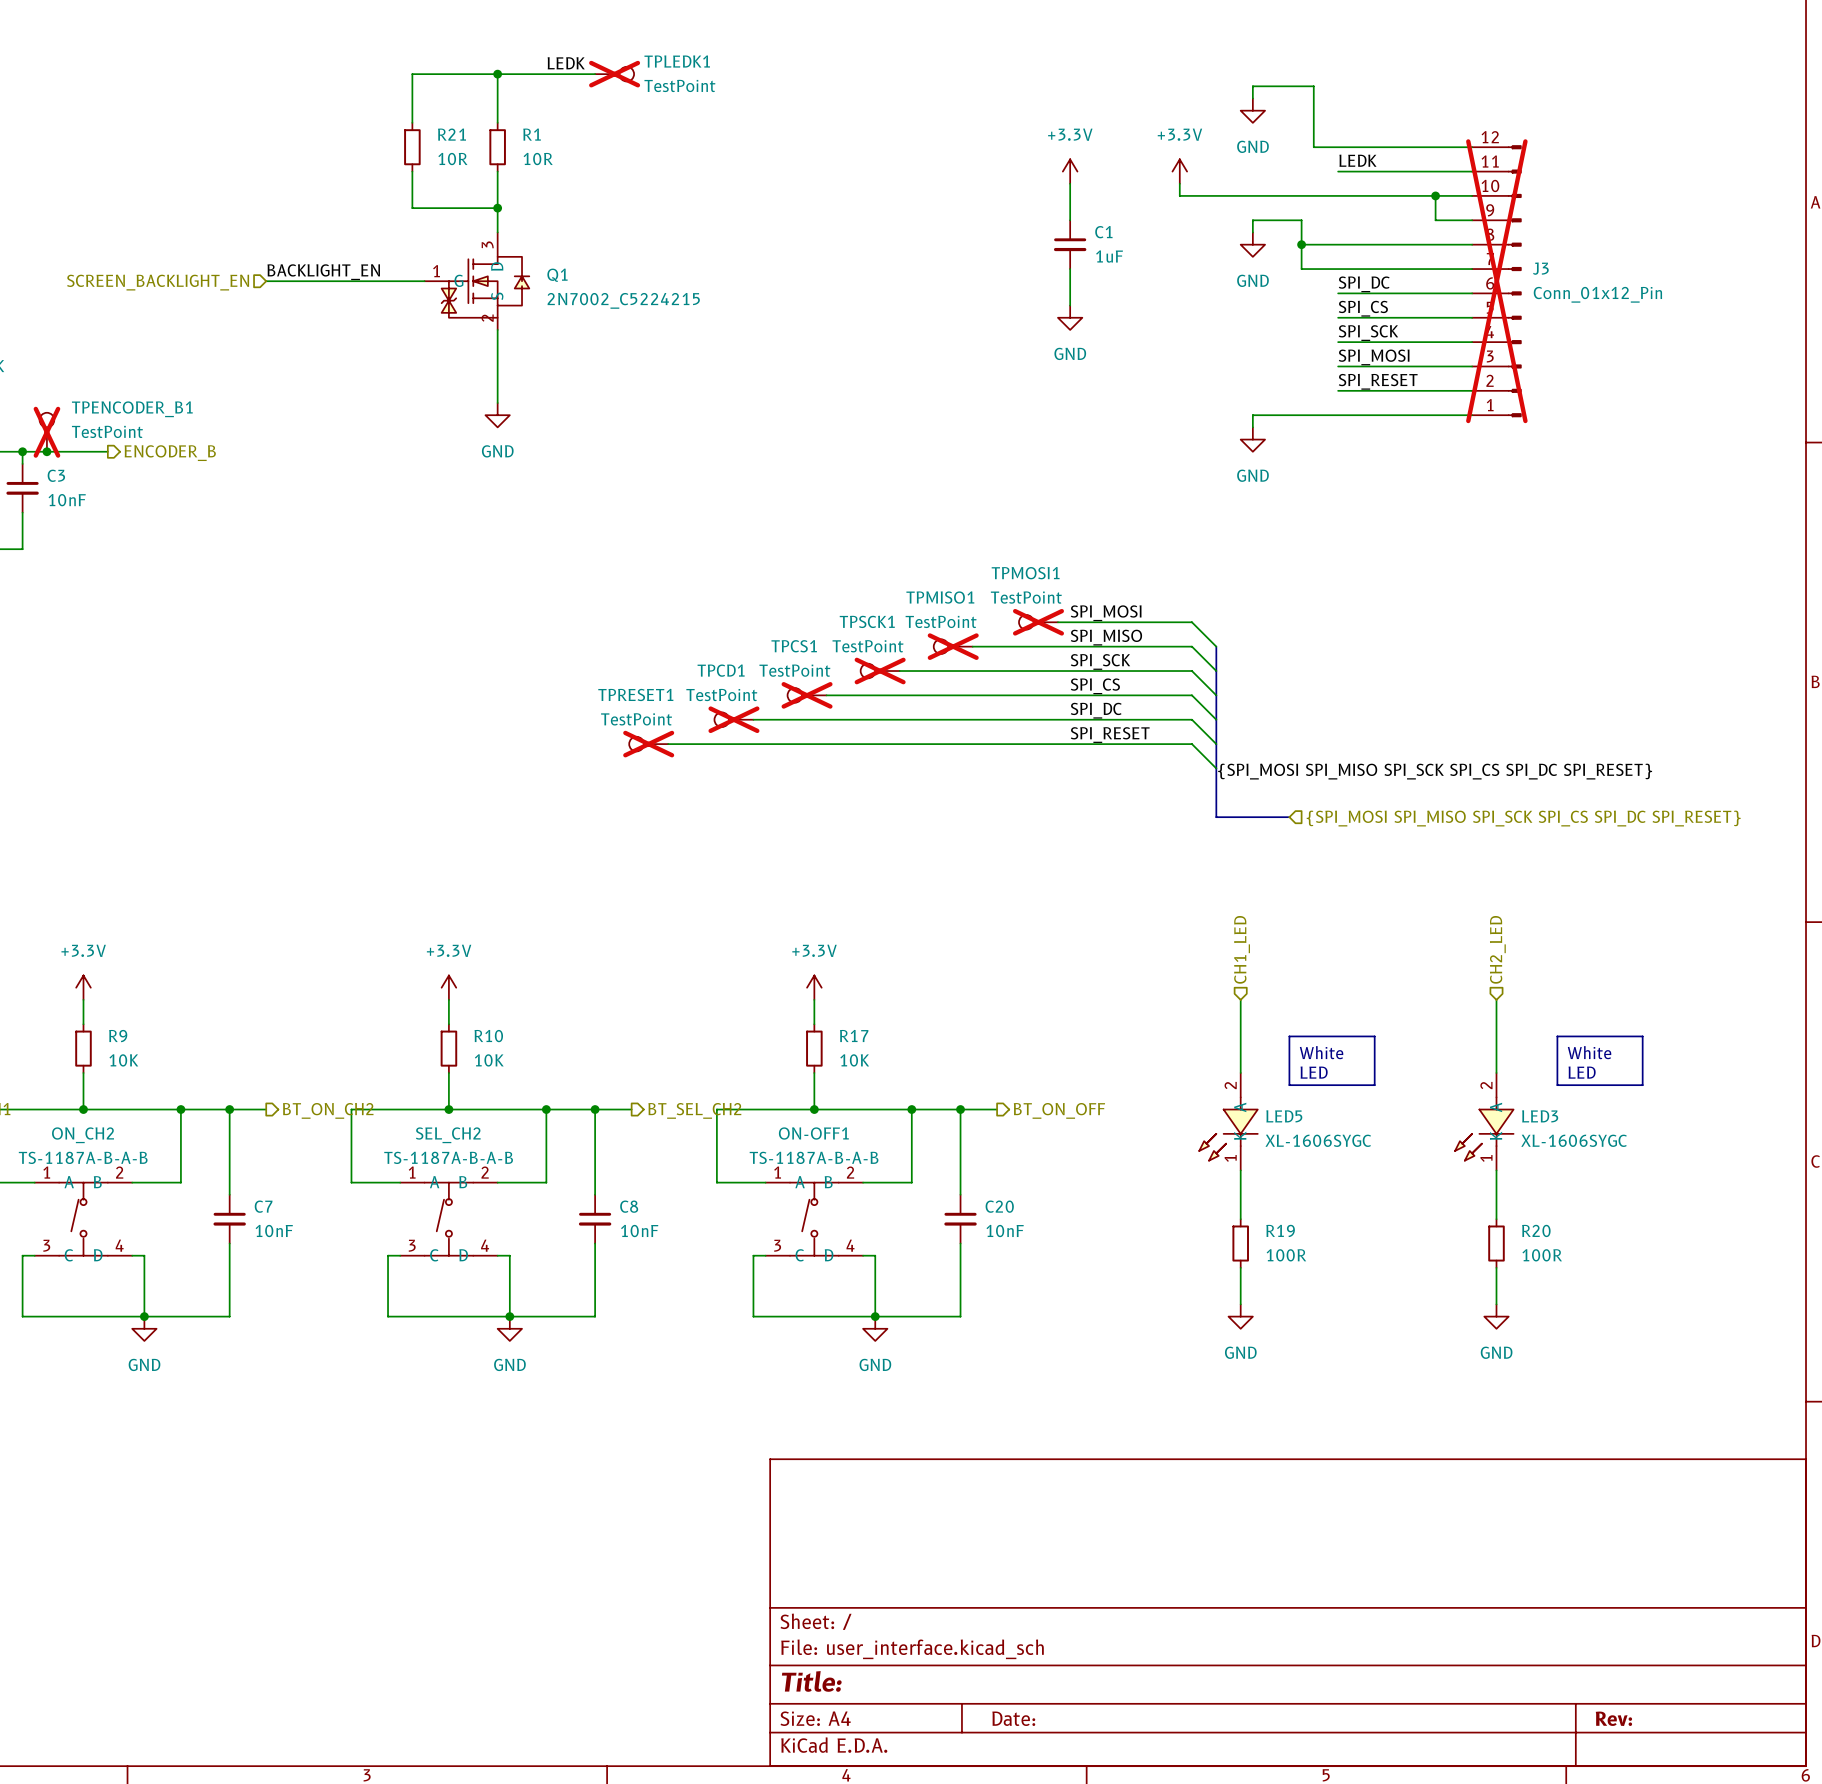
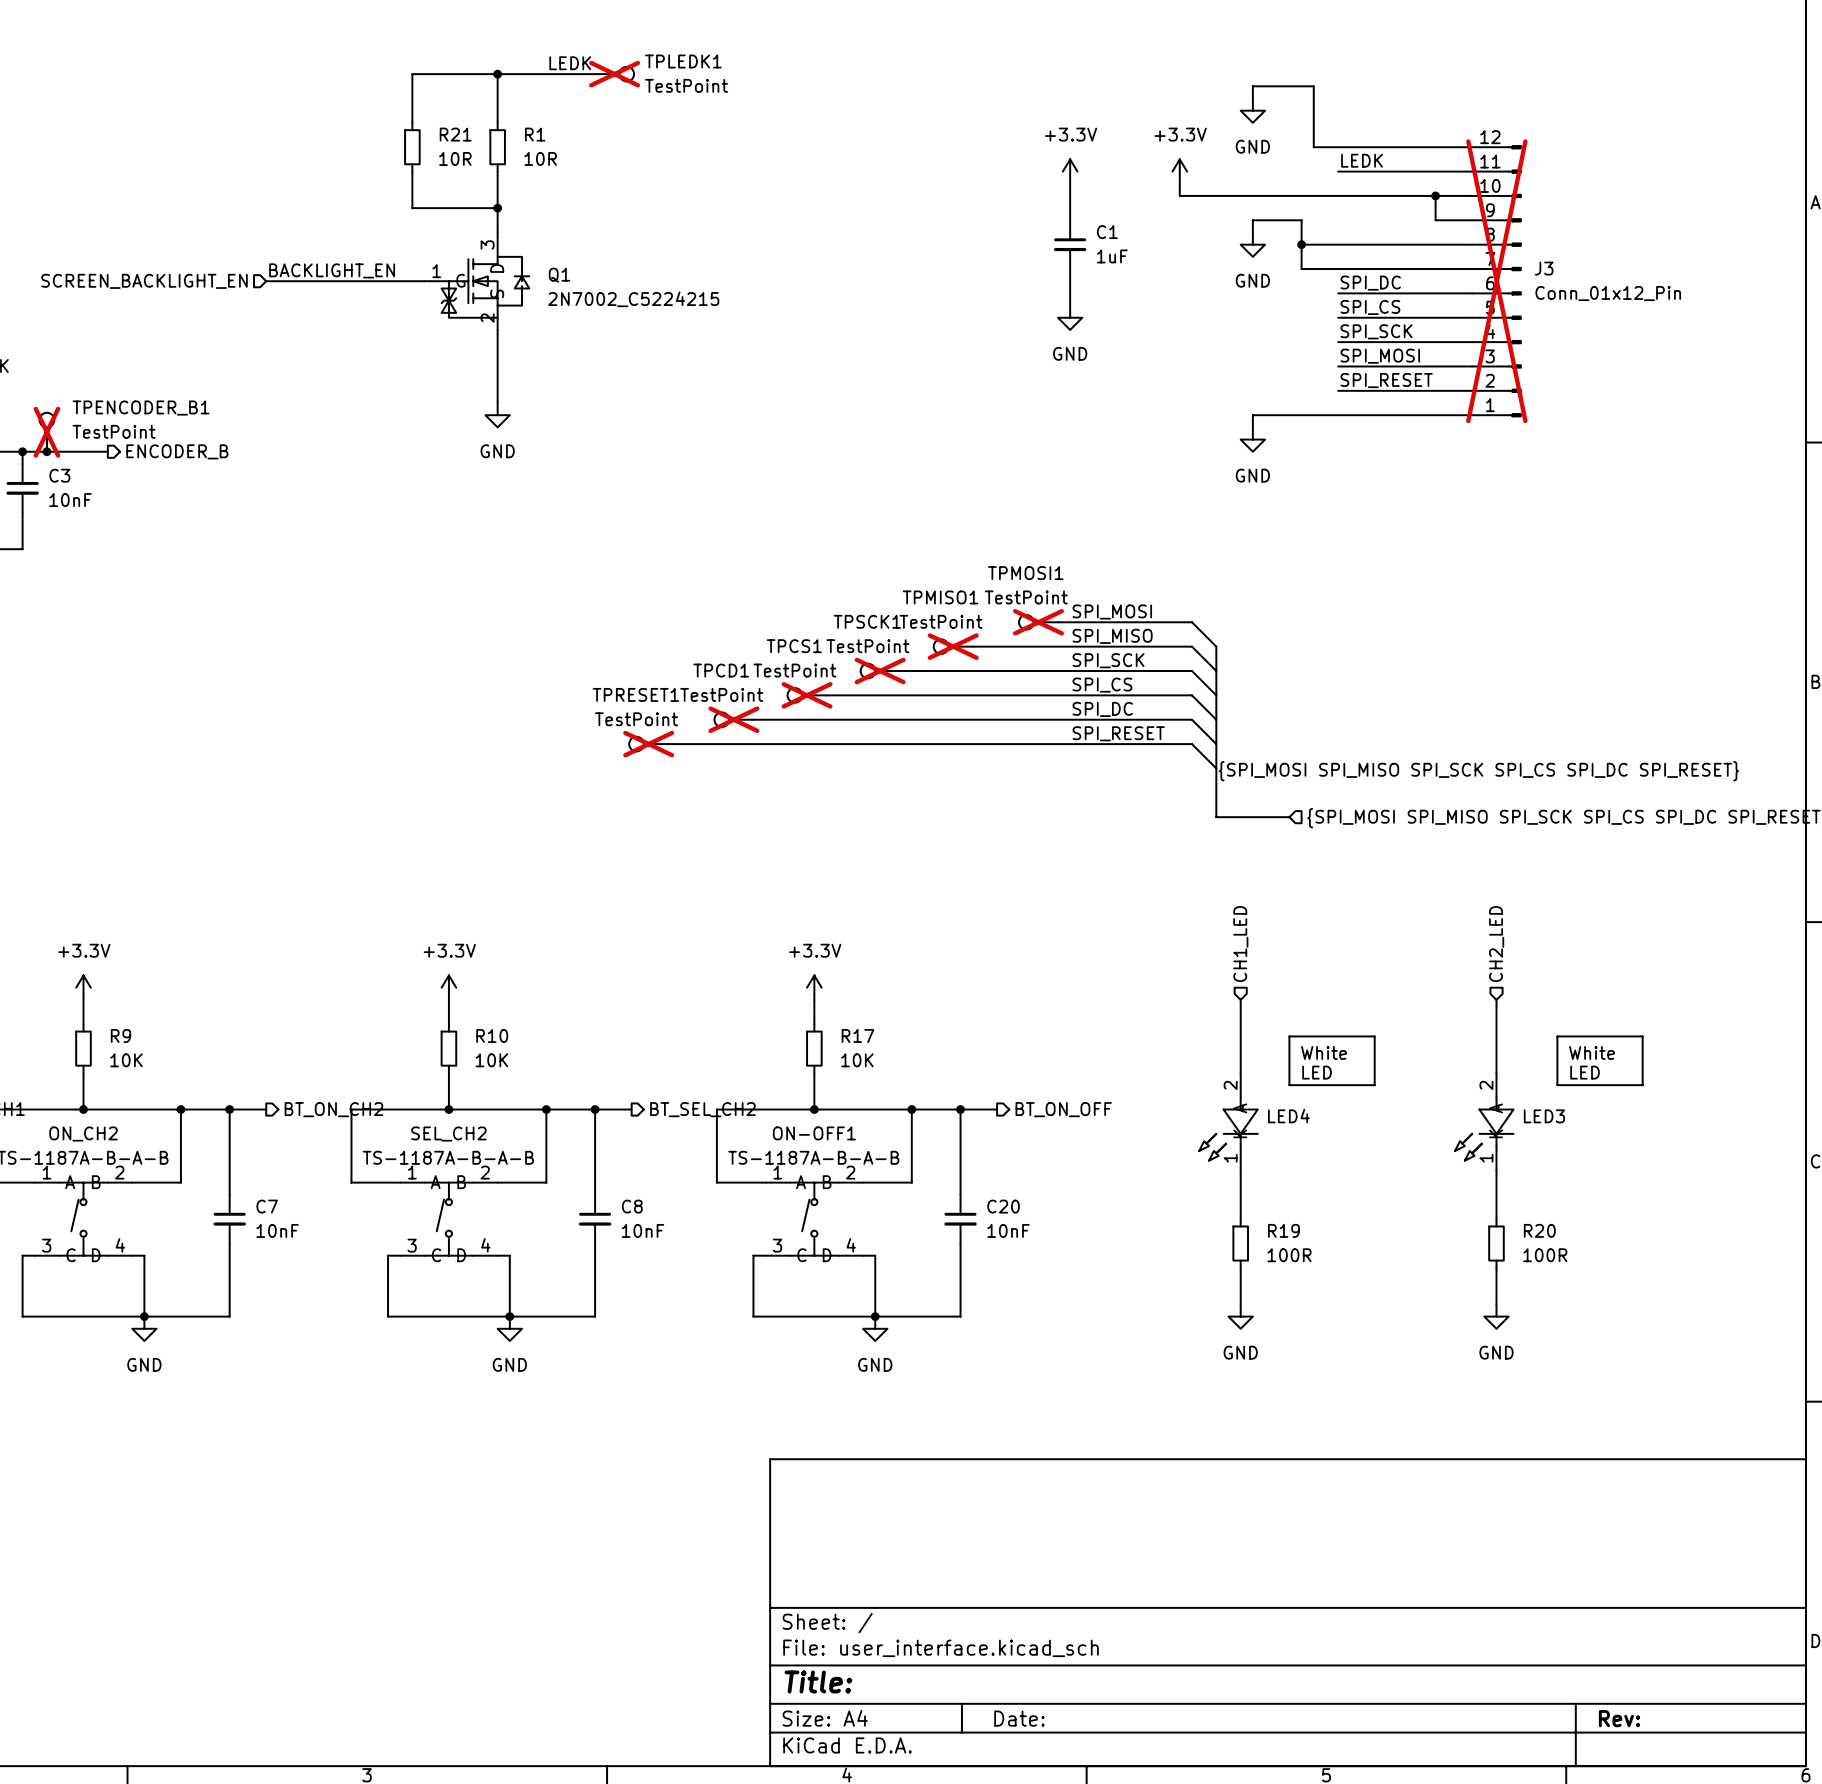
LED5 name: LED5 (1284, 1116) -> LED4 (1288, 1116)
LED5 value: XL-1606SYGC (1318, 1140) -> none
LED3 value: XL-1606SYGC (1574, 1140) -> none

